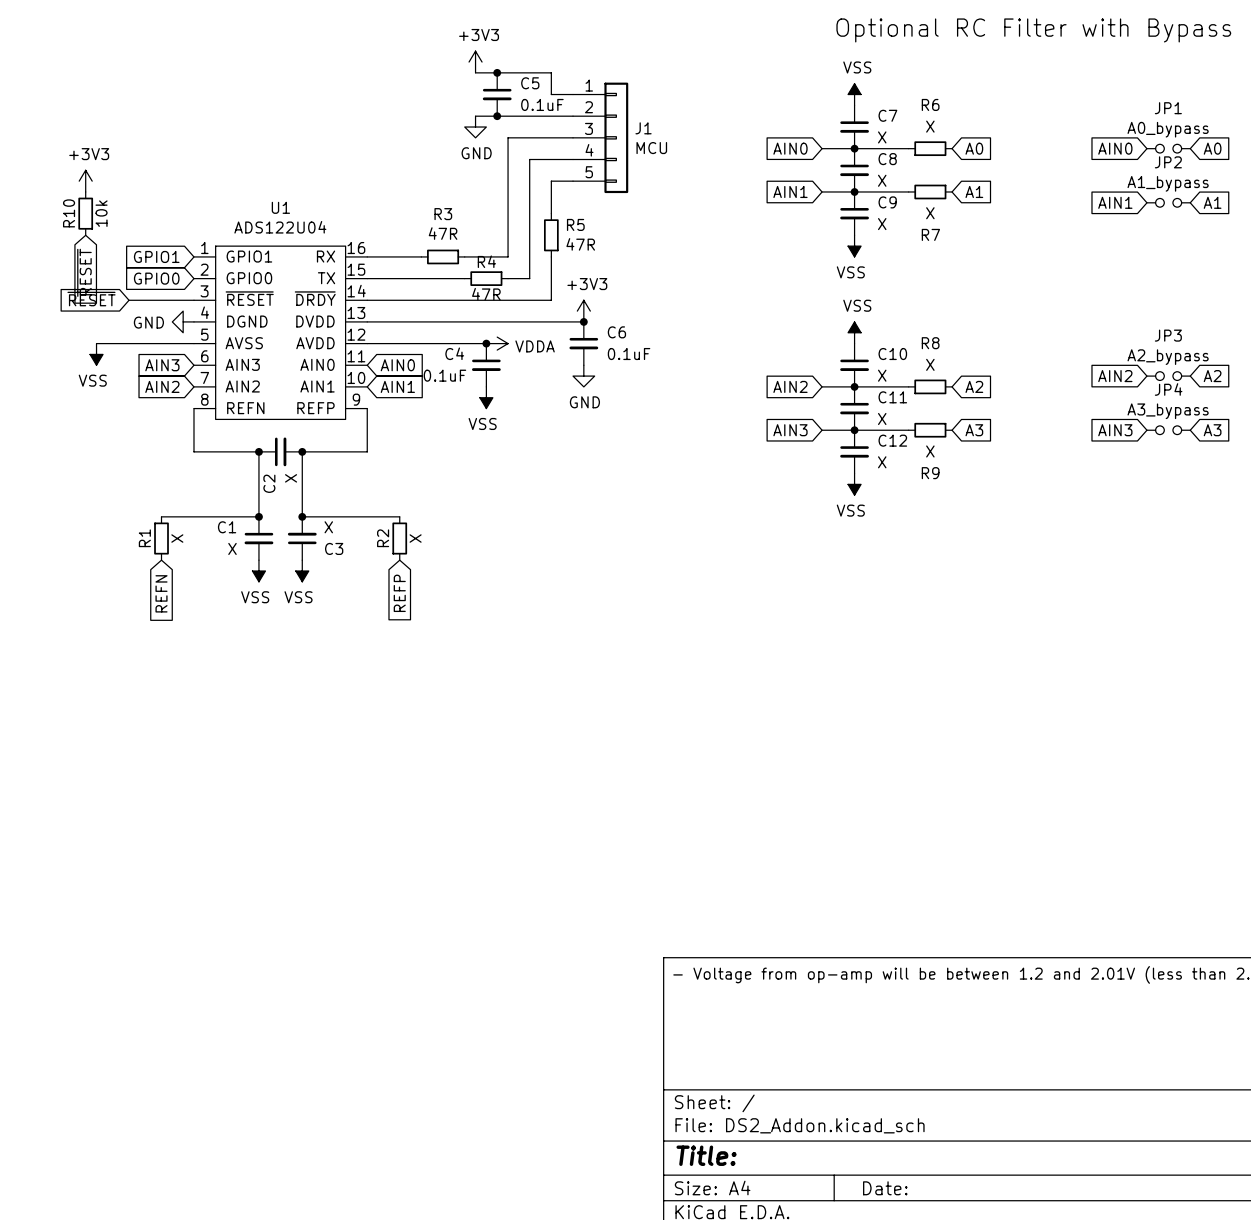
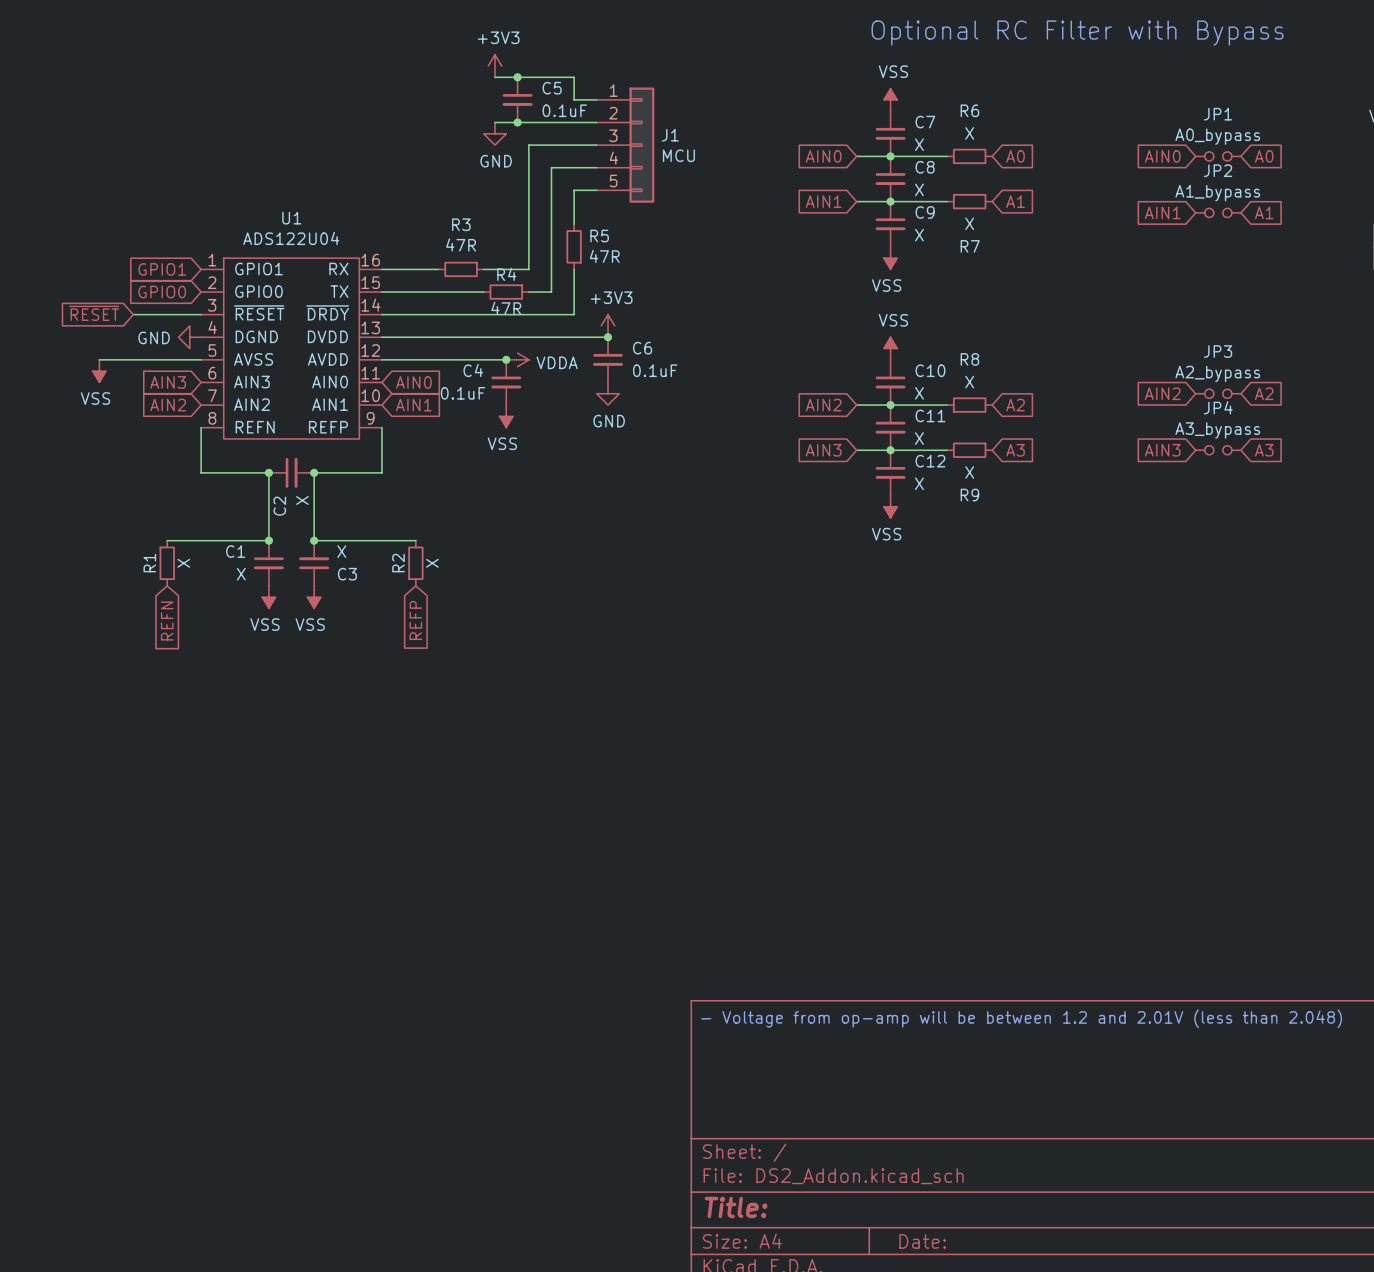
power symbol: +3V3 (85, 181) -> none
R10: 10k (85, 213) -> none
global label: ~{RESET} (84, 272) -> none

